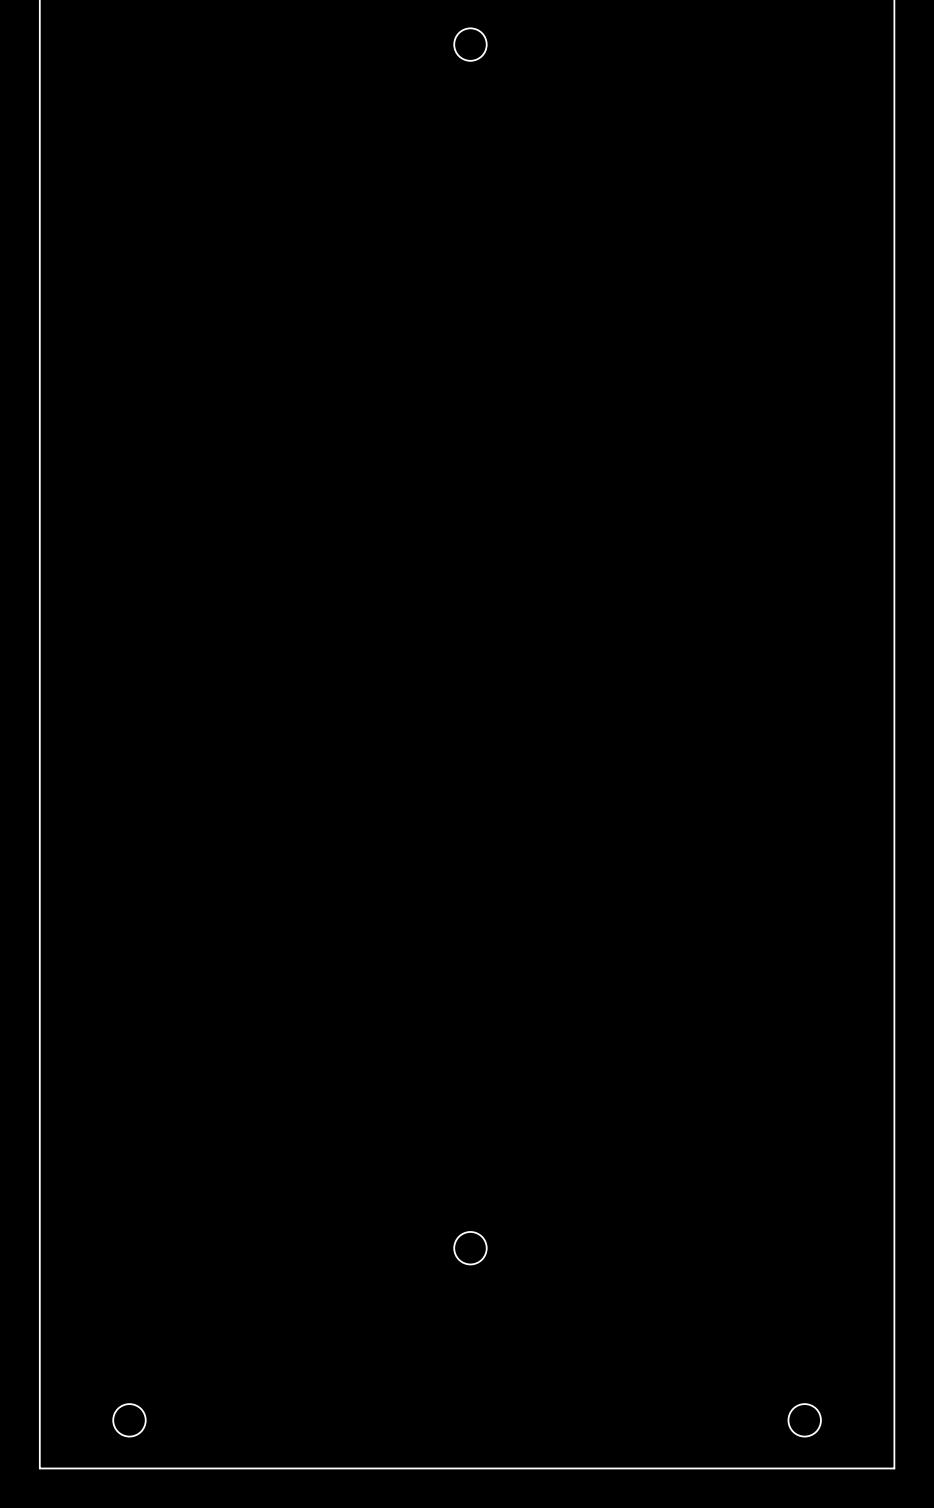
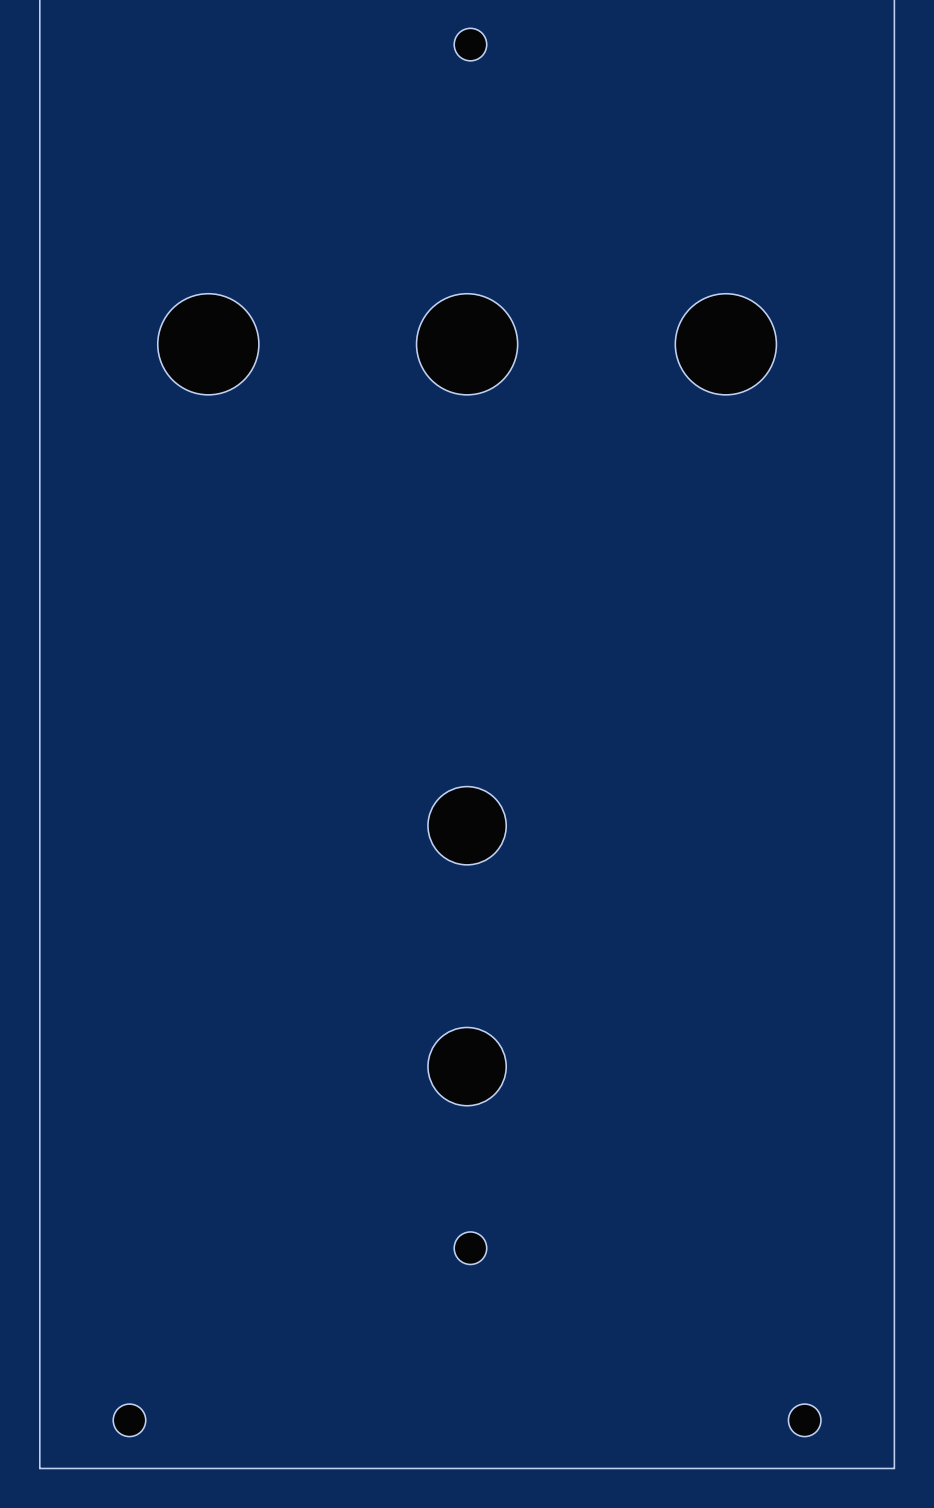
part: none -> (208, 344)
part: none -> (467, 344)
part: none -> (725, 344)
part: none -> (467, 825)
part: none -> (467, 1066)

